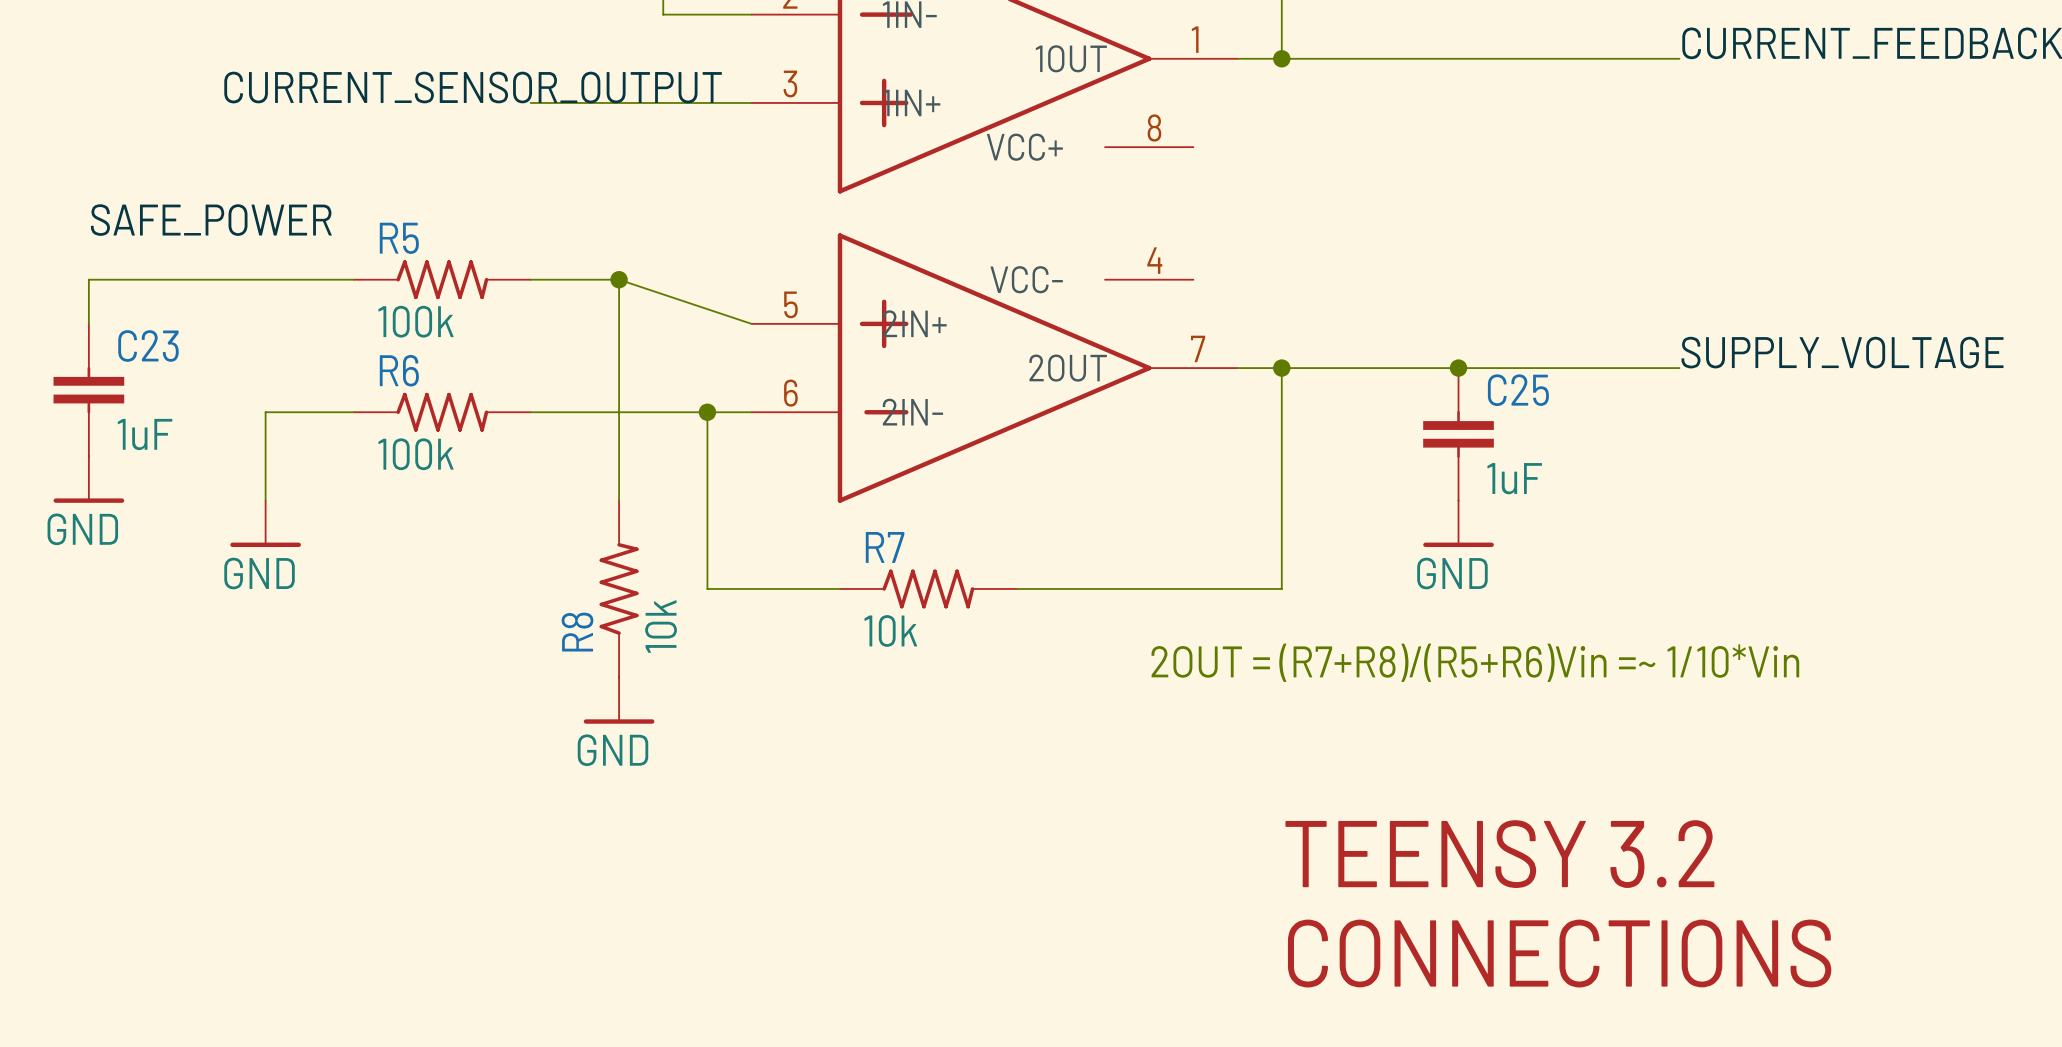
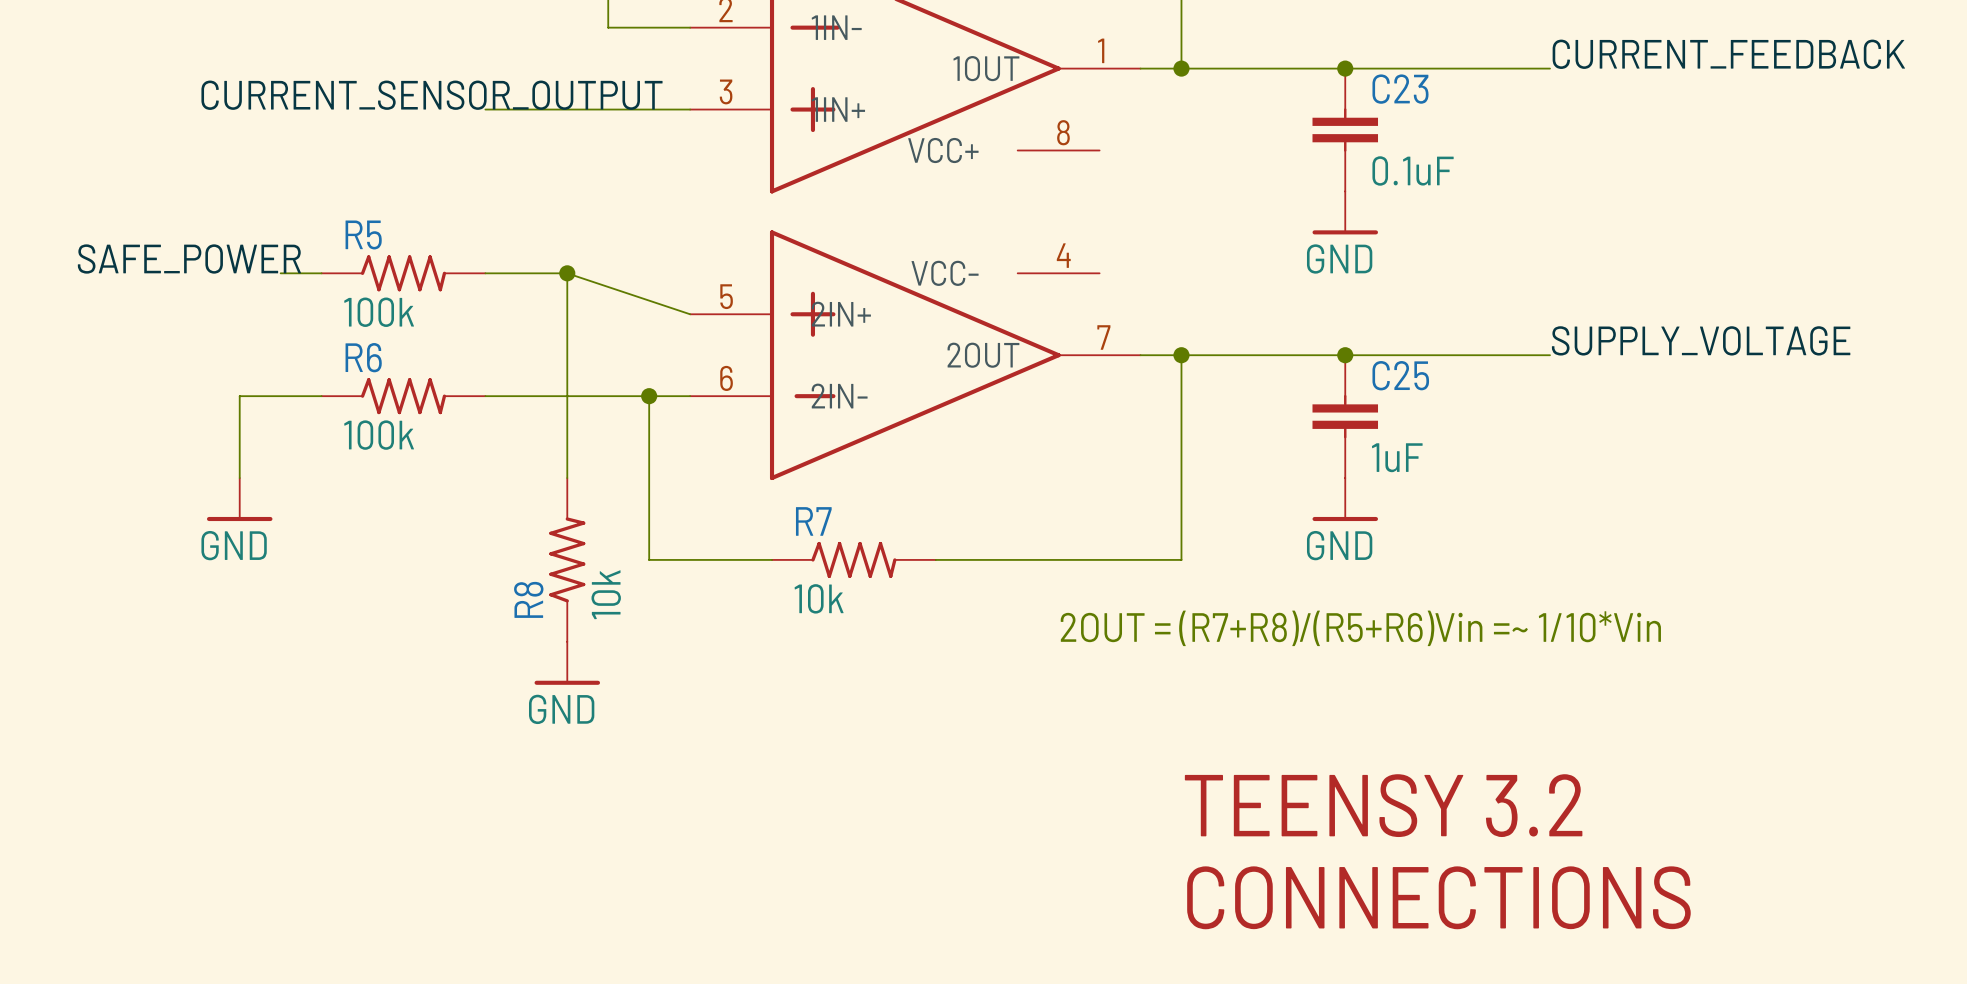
junction: none -> (1345, 68)
power symbol: none -> GND (1345, 212)
label position: SAFE_POWER (211, 220) -> SAFE_POWER (189, 258)
wire: (309, 279) (88, 279) (88, 323) -> none
C23 position: (88, 390) -> (1345, 130)
C23 value: 1uF (145, 434) -> 0.1uF (1413, 170)
power symbol: GND (88, 479) -> none

